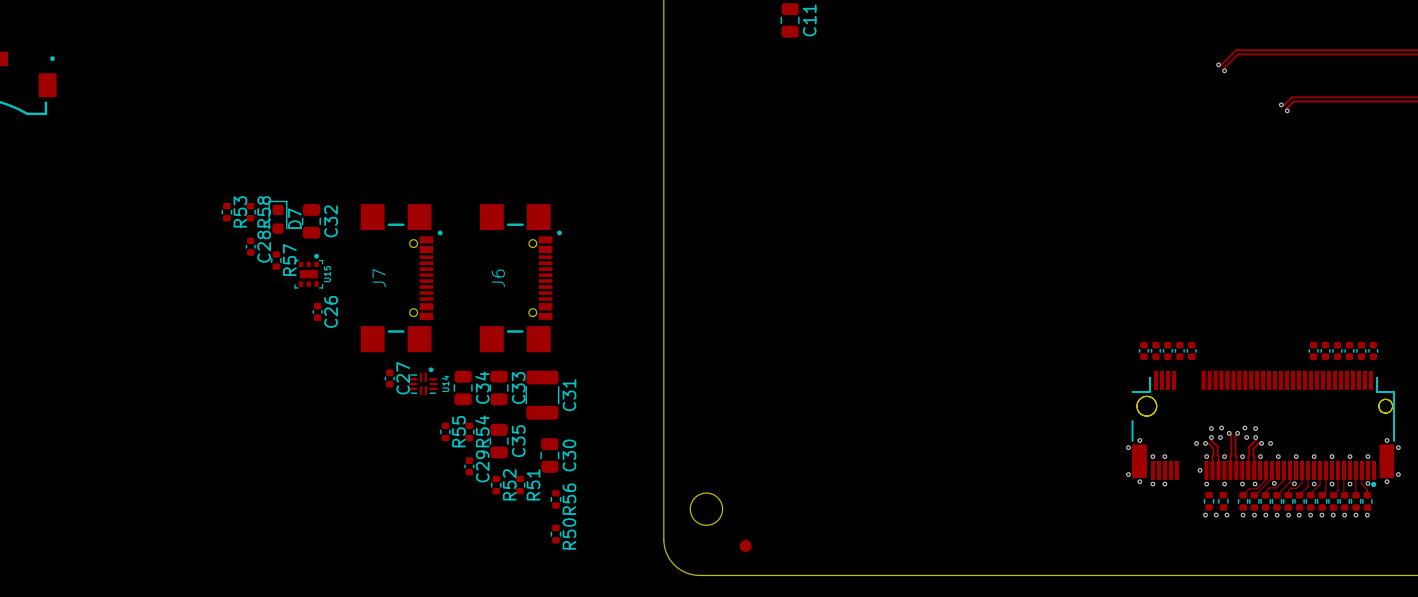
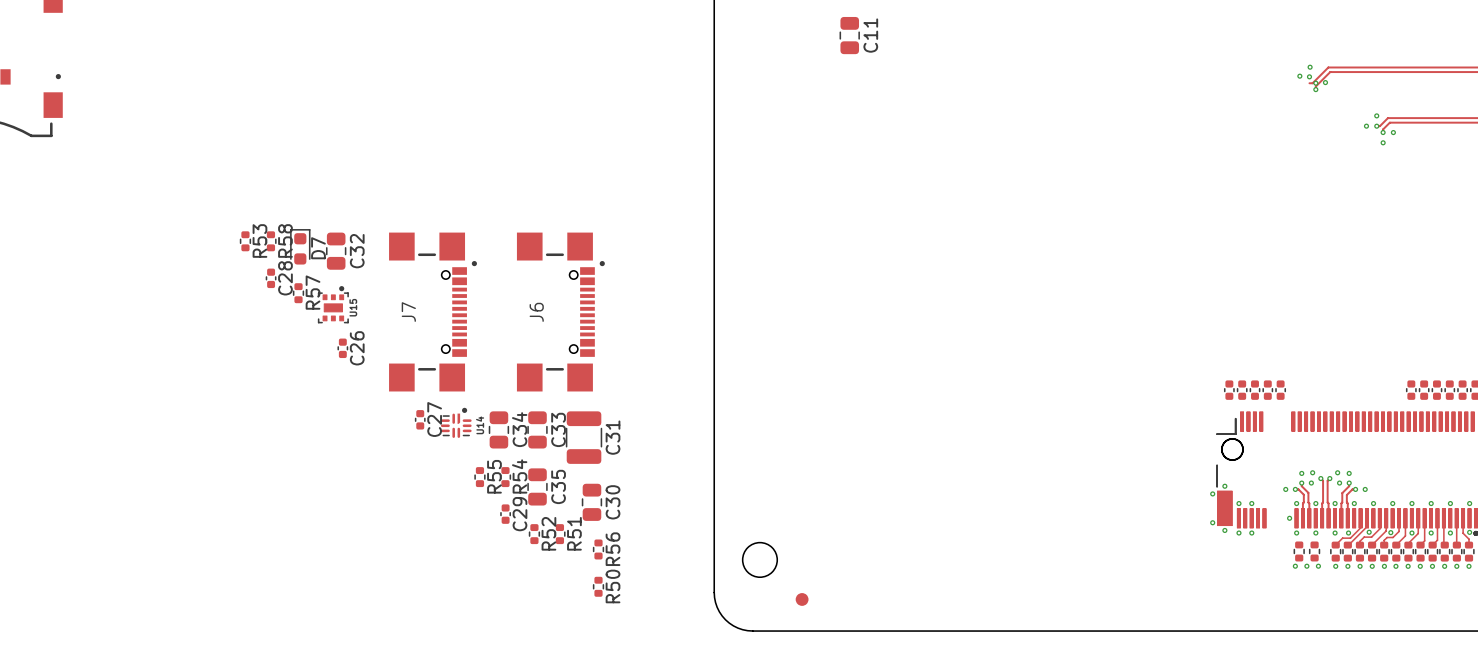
via: none -> (1310, 67)
via: none -> (1299, 76)
via: none -> (1309, 76)
via: (1218, 64) -> none
via: none -> (1315, 83)
via: none -> (1325, 82)
via: none -> (1376, 115)
via: none -> (1366, 126)
via: none -> (1393, 132)
via: none -> (1383, 142)

